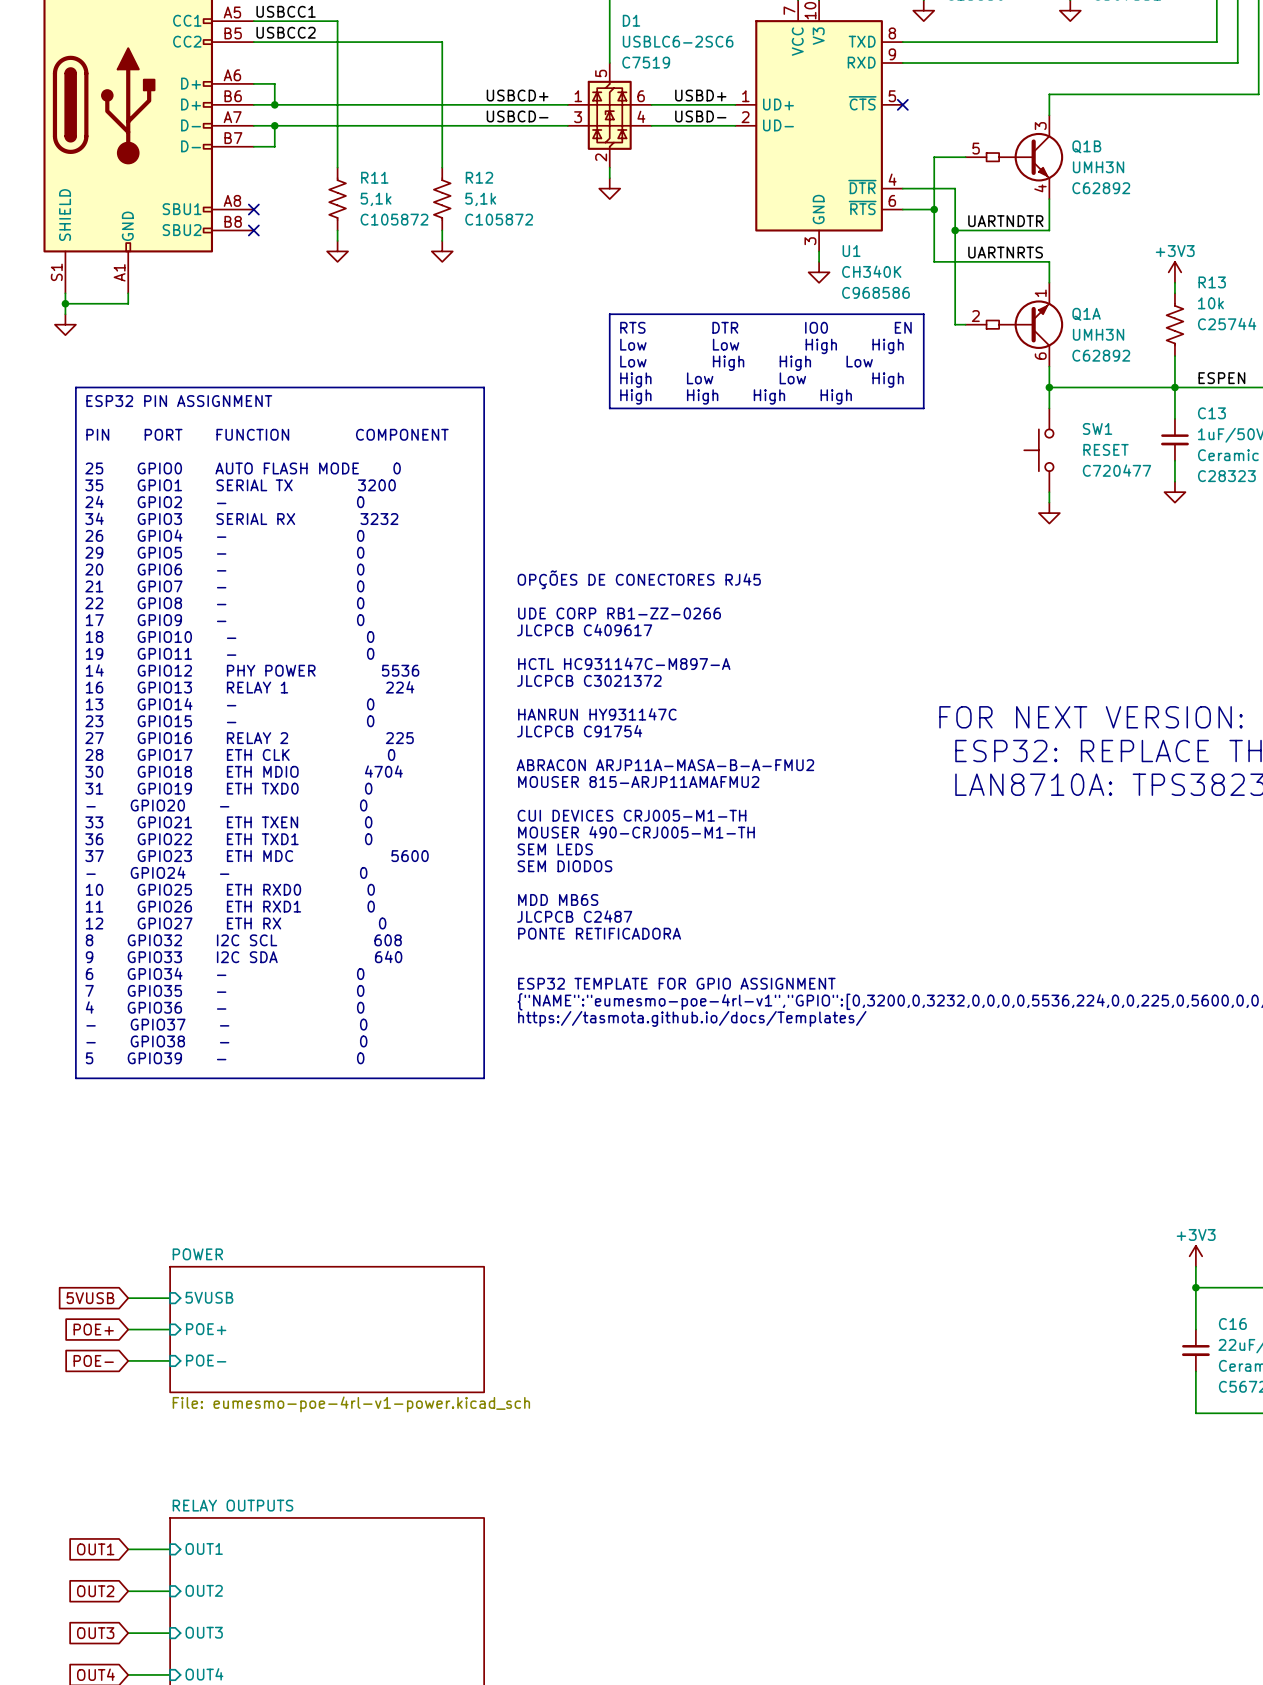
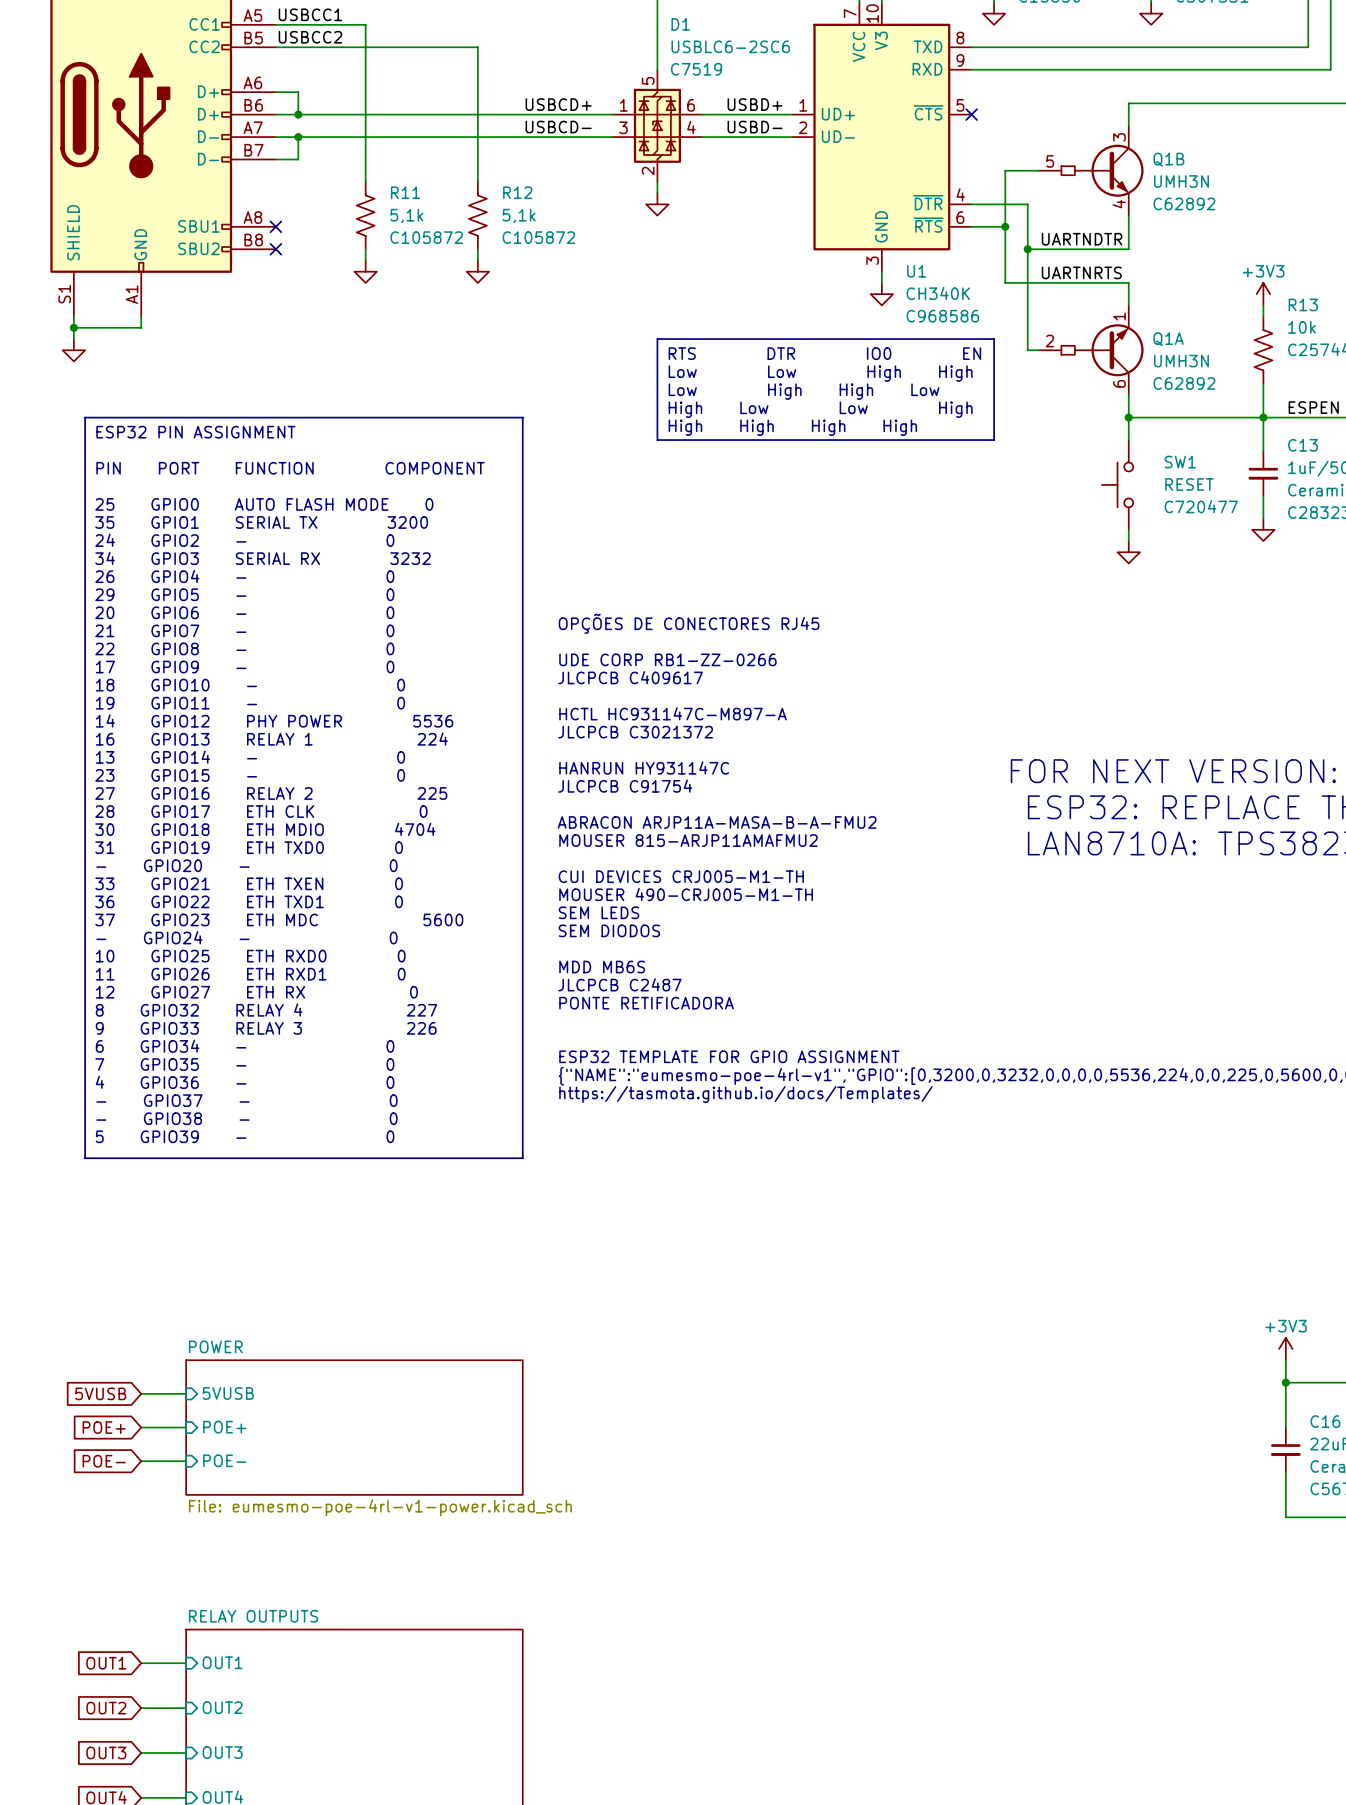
text: 8 GPIO32 I2C SCL 608 (243, 940) -> 8 GPIO32 RELAY 4 227 (266, 1010)
text: 9 GPIO33 I2C SDA 640 (244, 956) -> 9 GPIO33 RELAY 3 226 (266, 1028)

